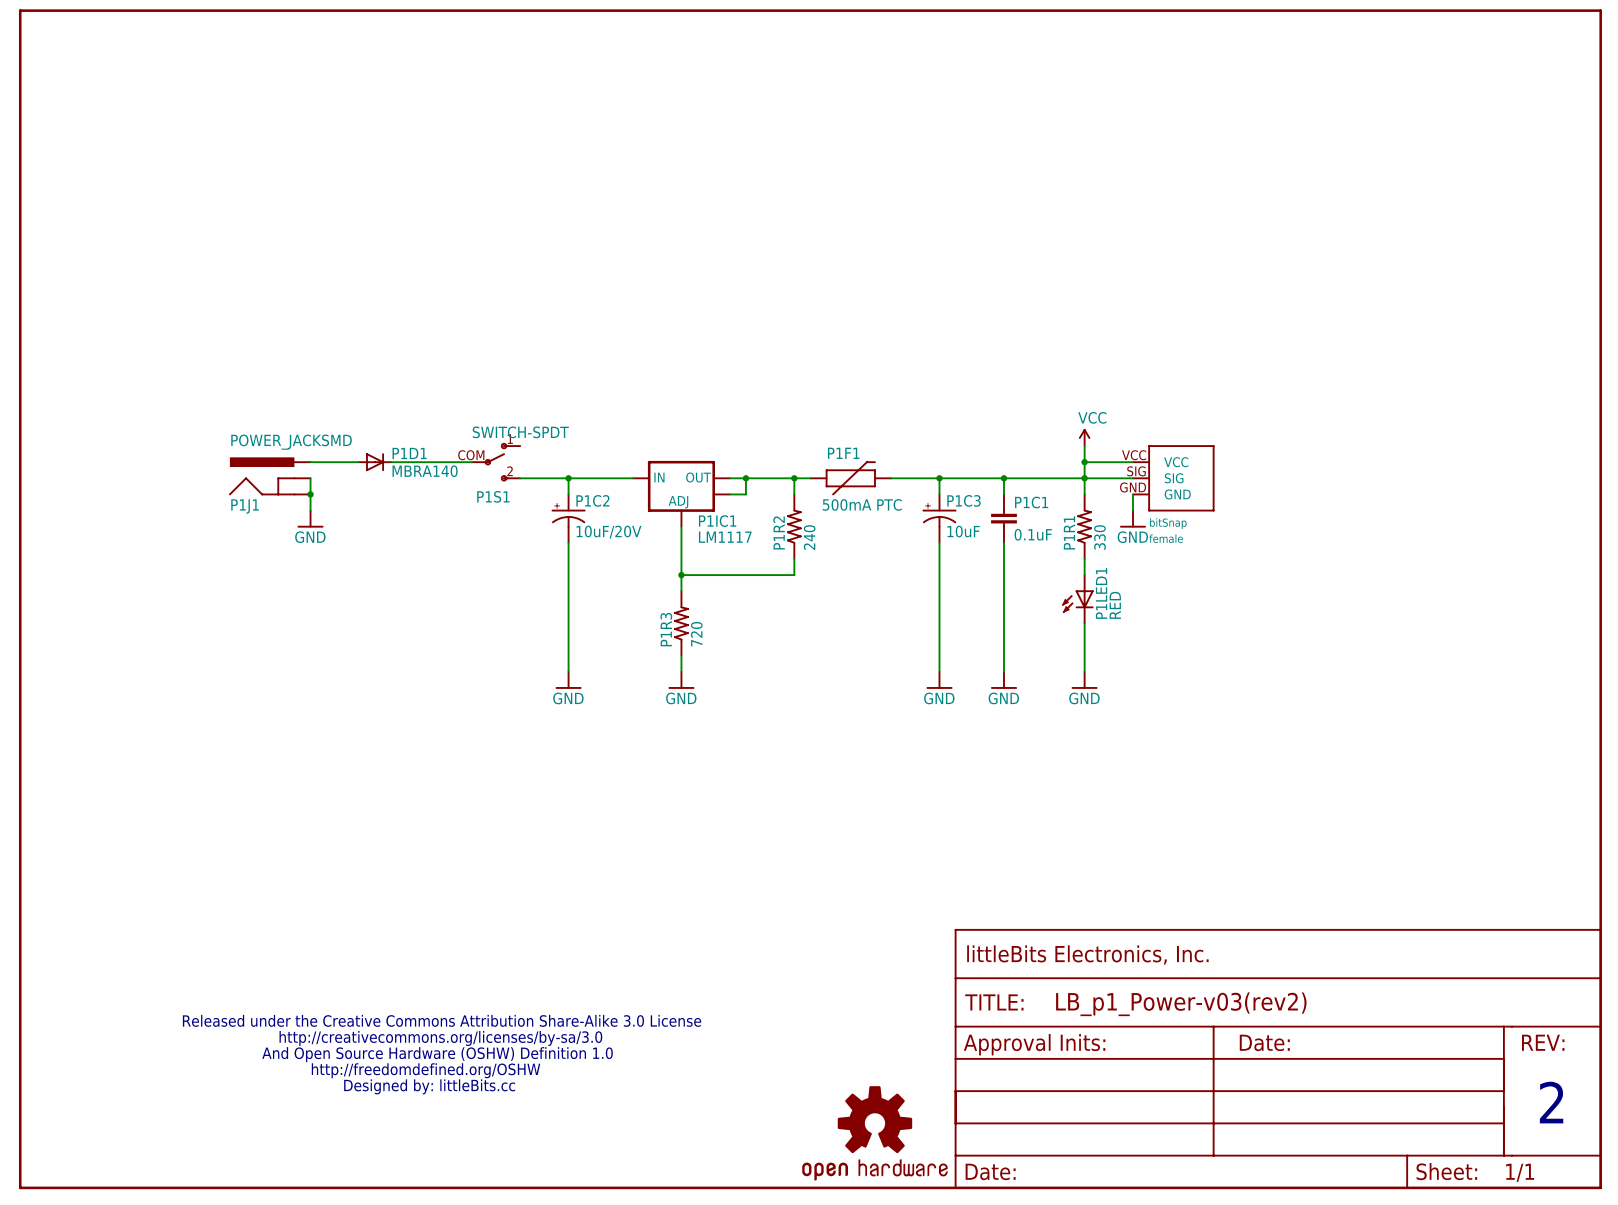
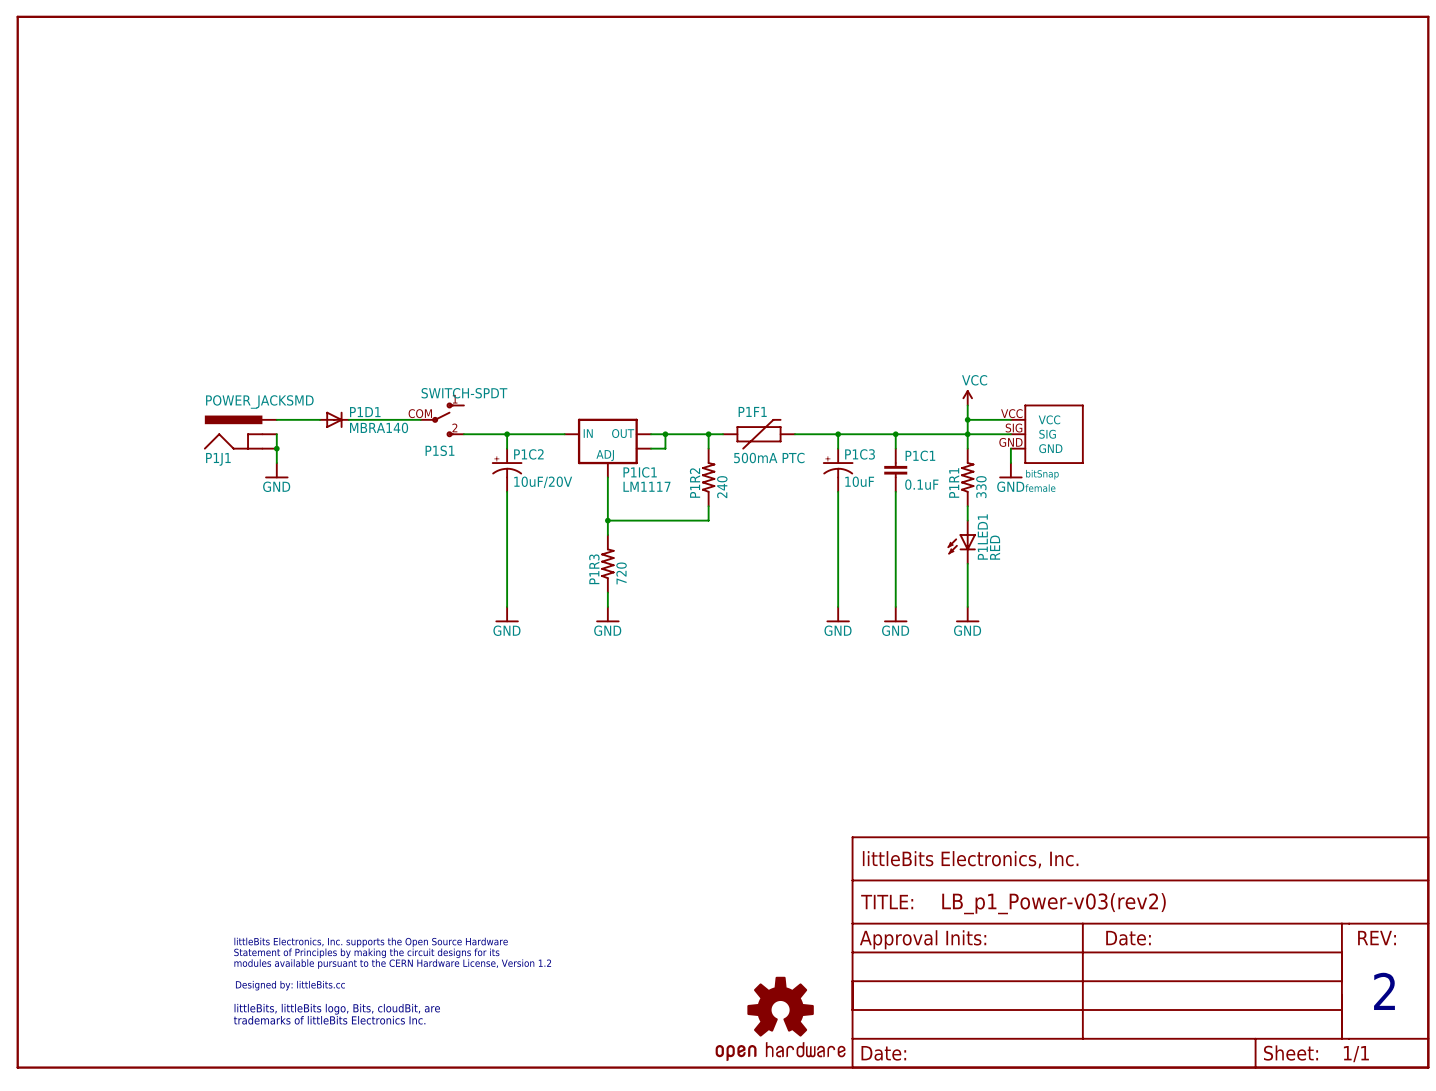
part: (442, 1054) -> none
part: none -> (392, 981)

